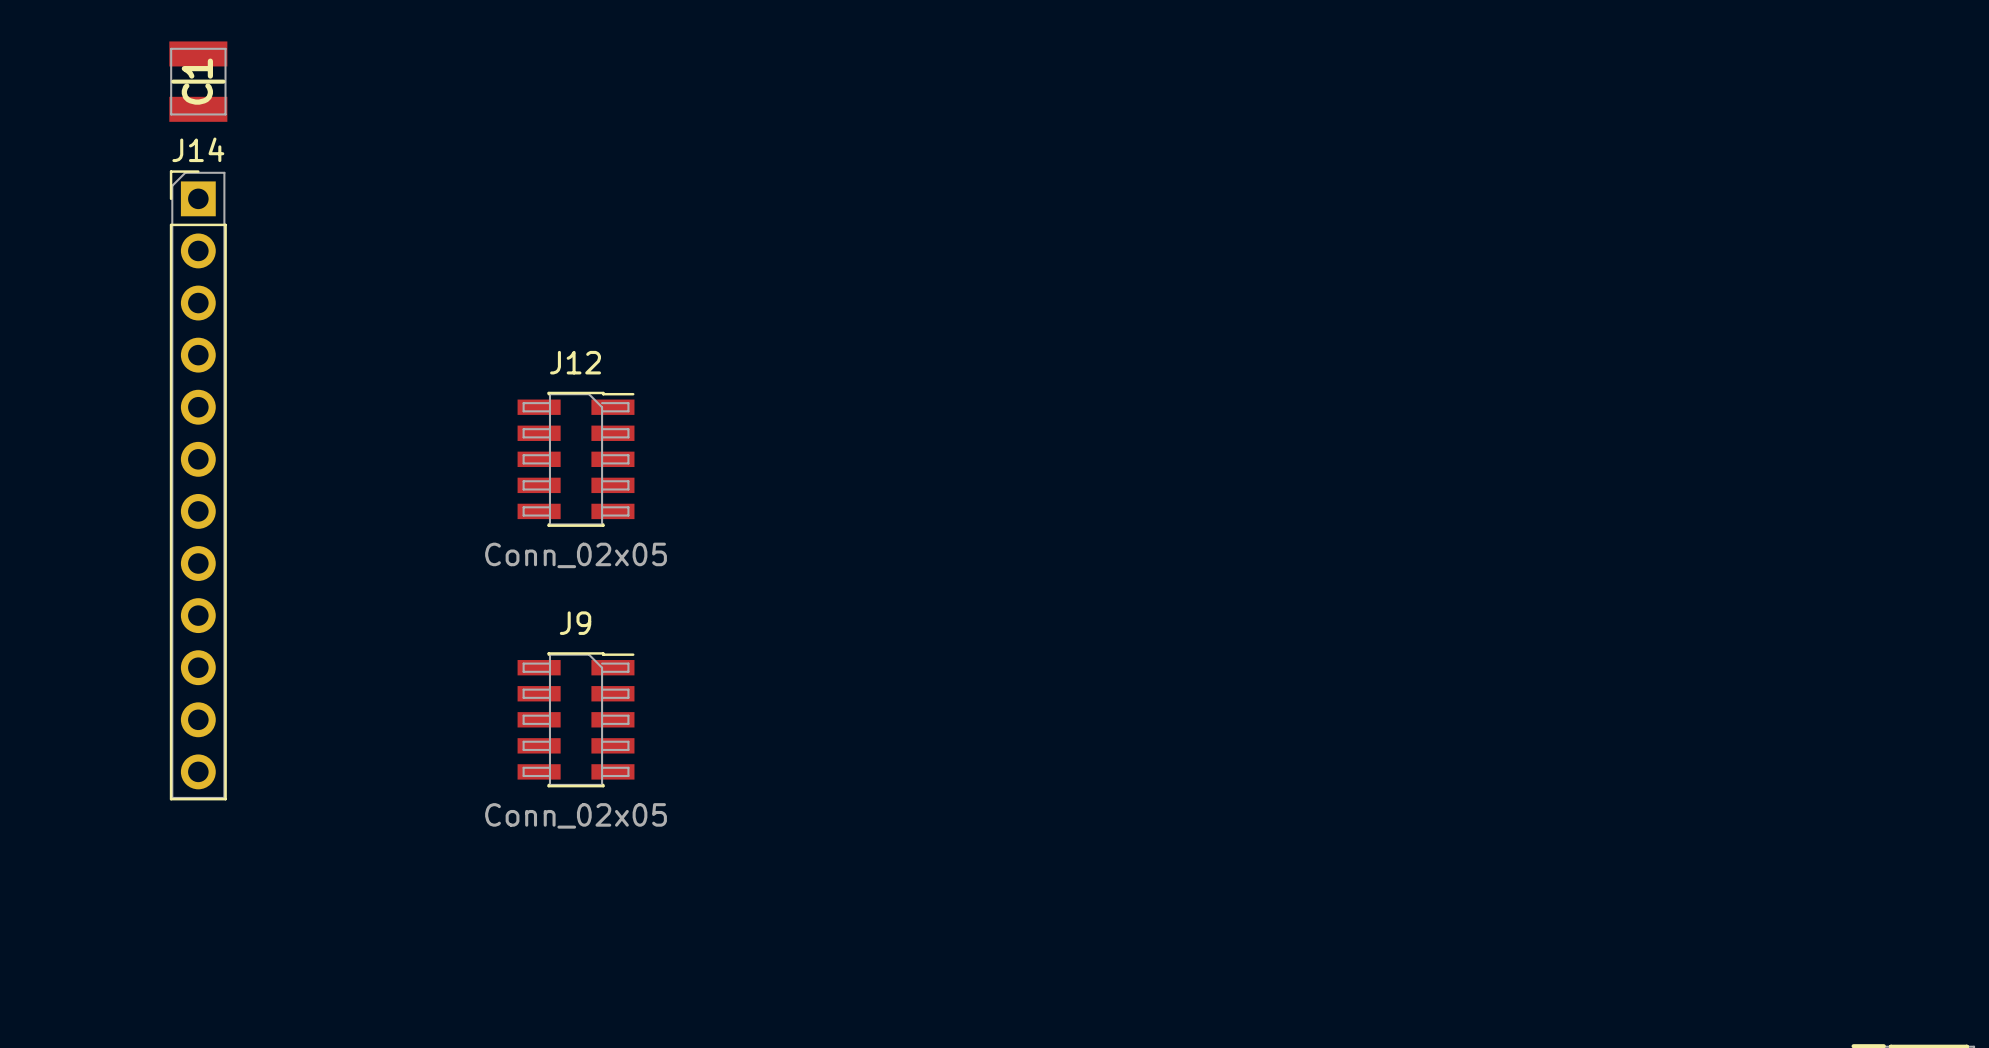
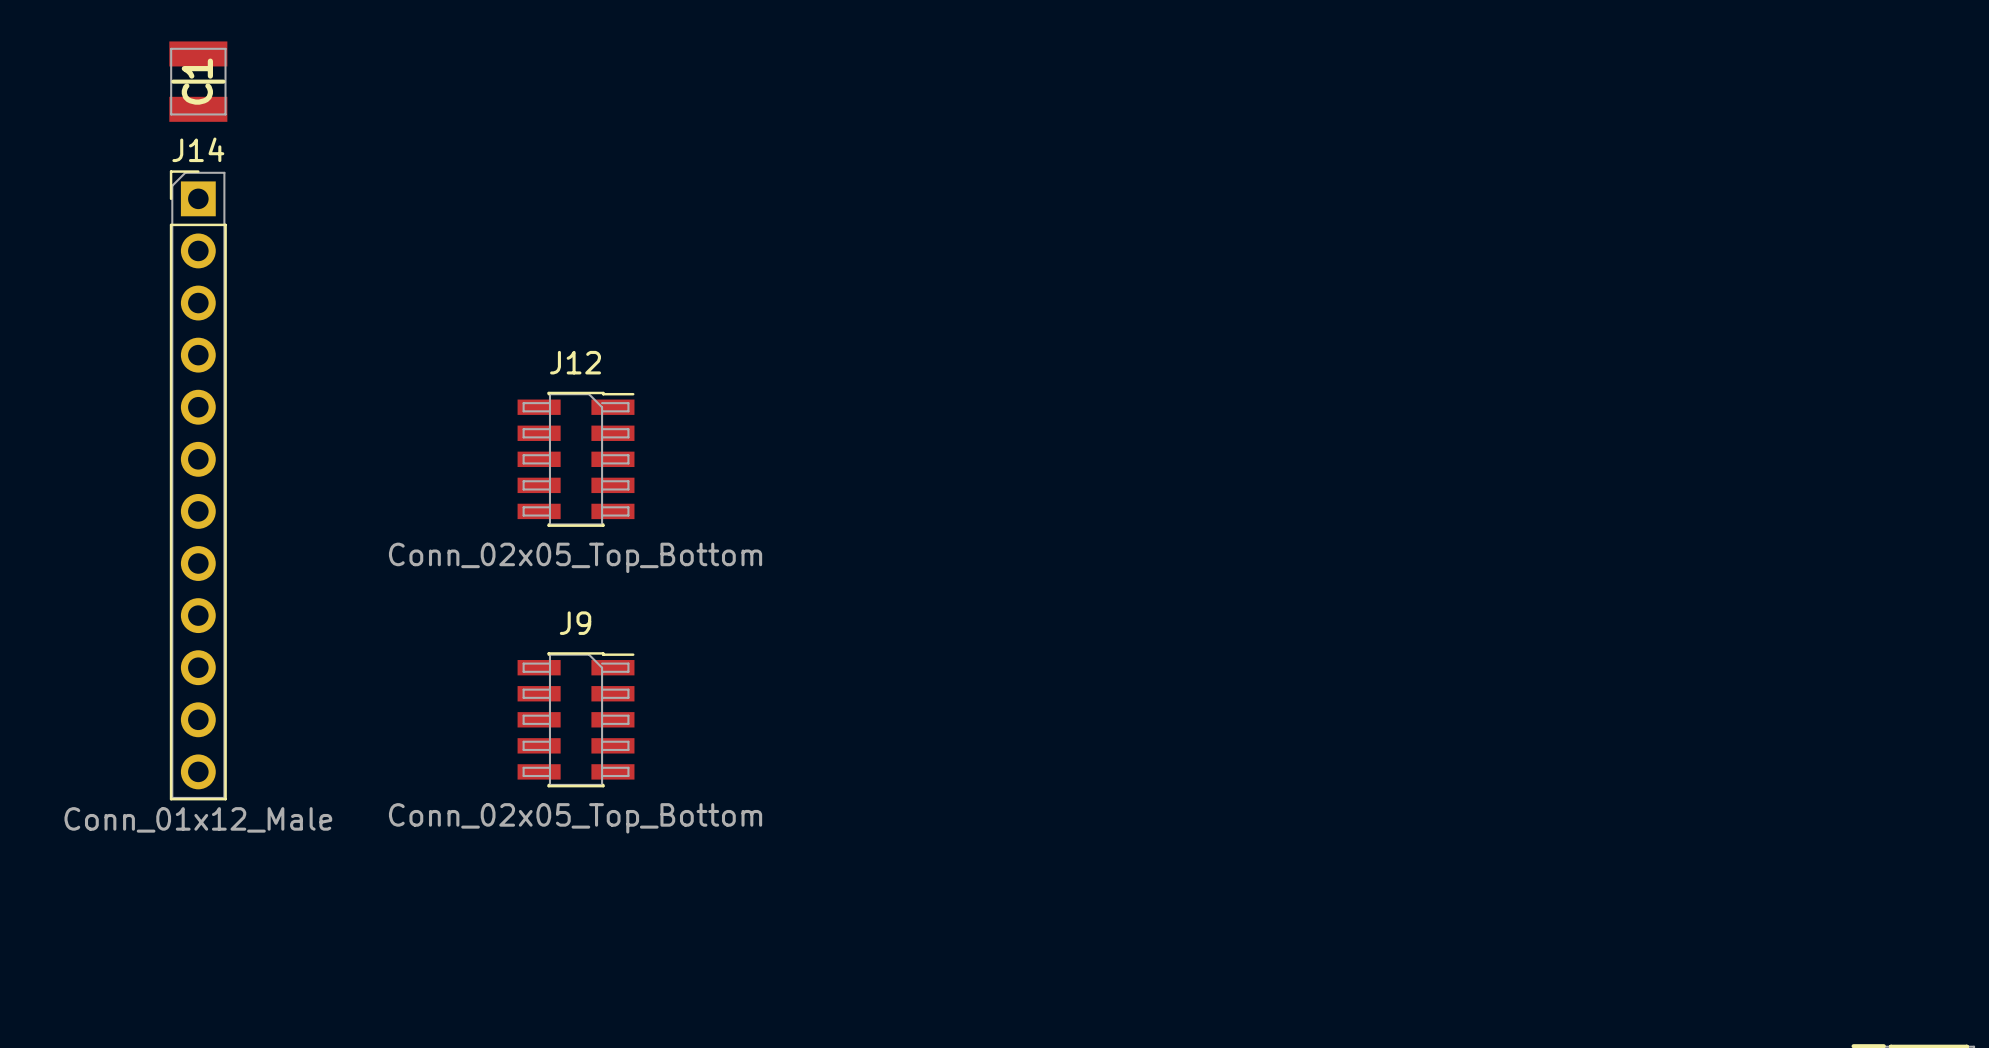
J12 value: Conn_02x05 (576, 555) -> Conn_02x05_Top_Bottom (575, 557)
J9 value: Conn_02x05 (576, 815) -> Conn_02x05_Top_Bottom (575, 818)
J14 value: none -> Conn_01x12_Male (198, 819)

